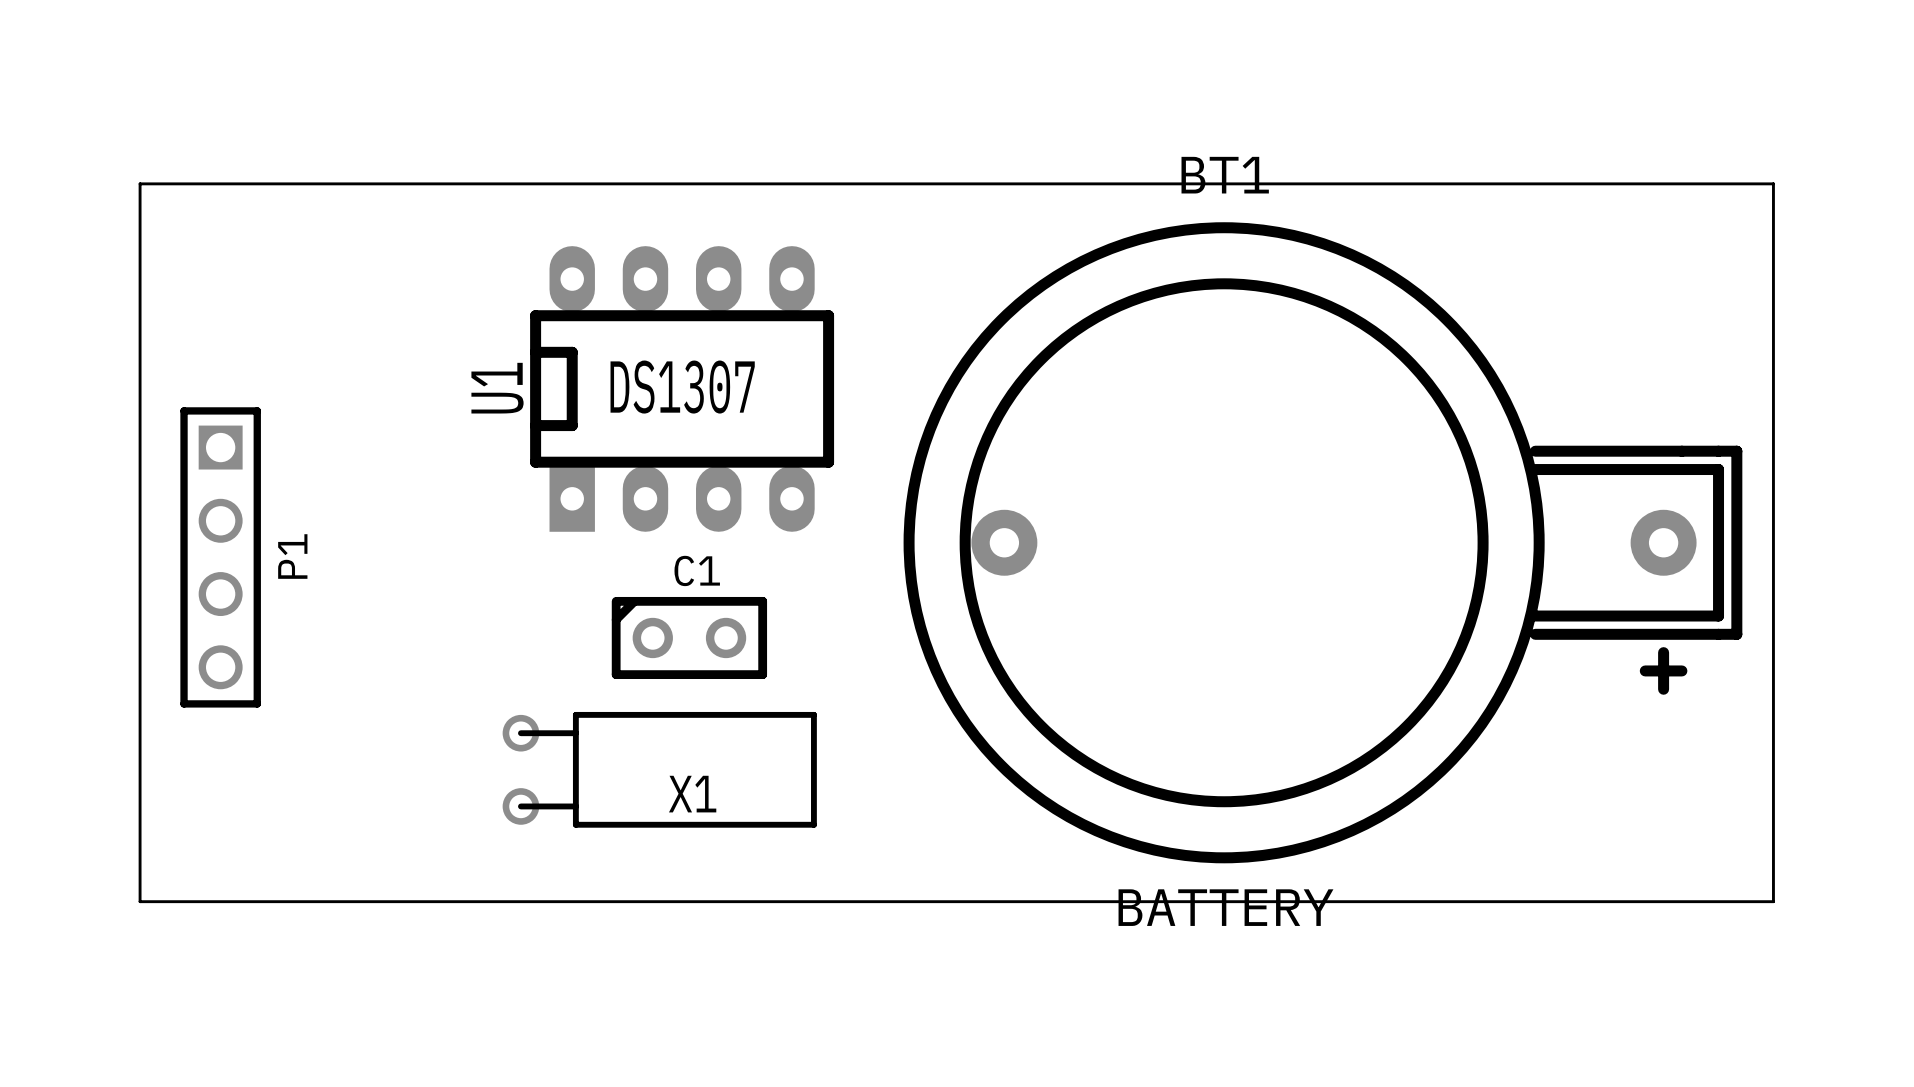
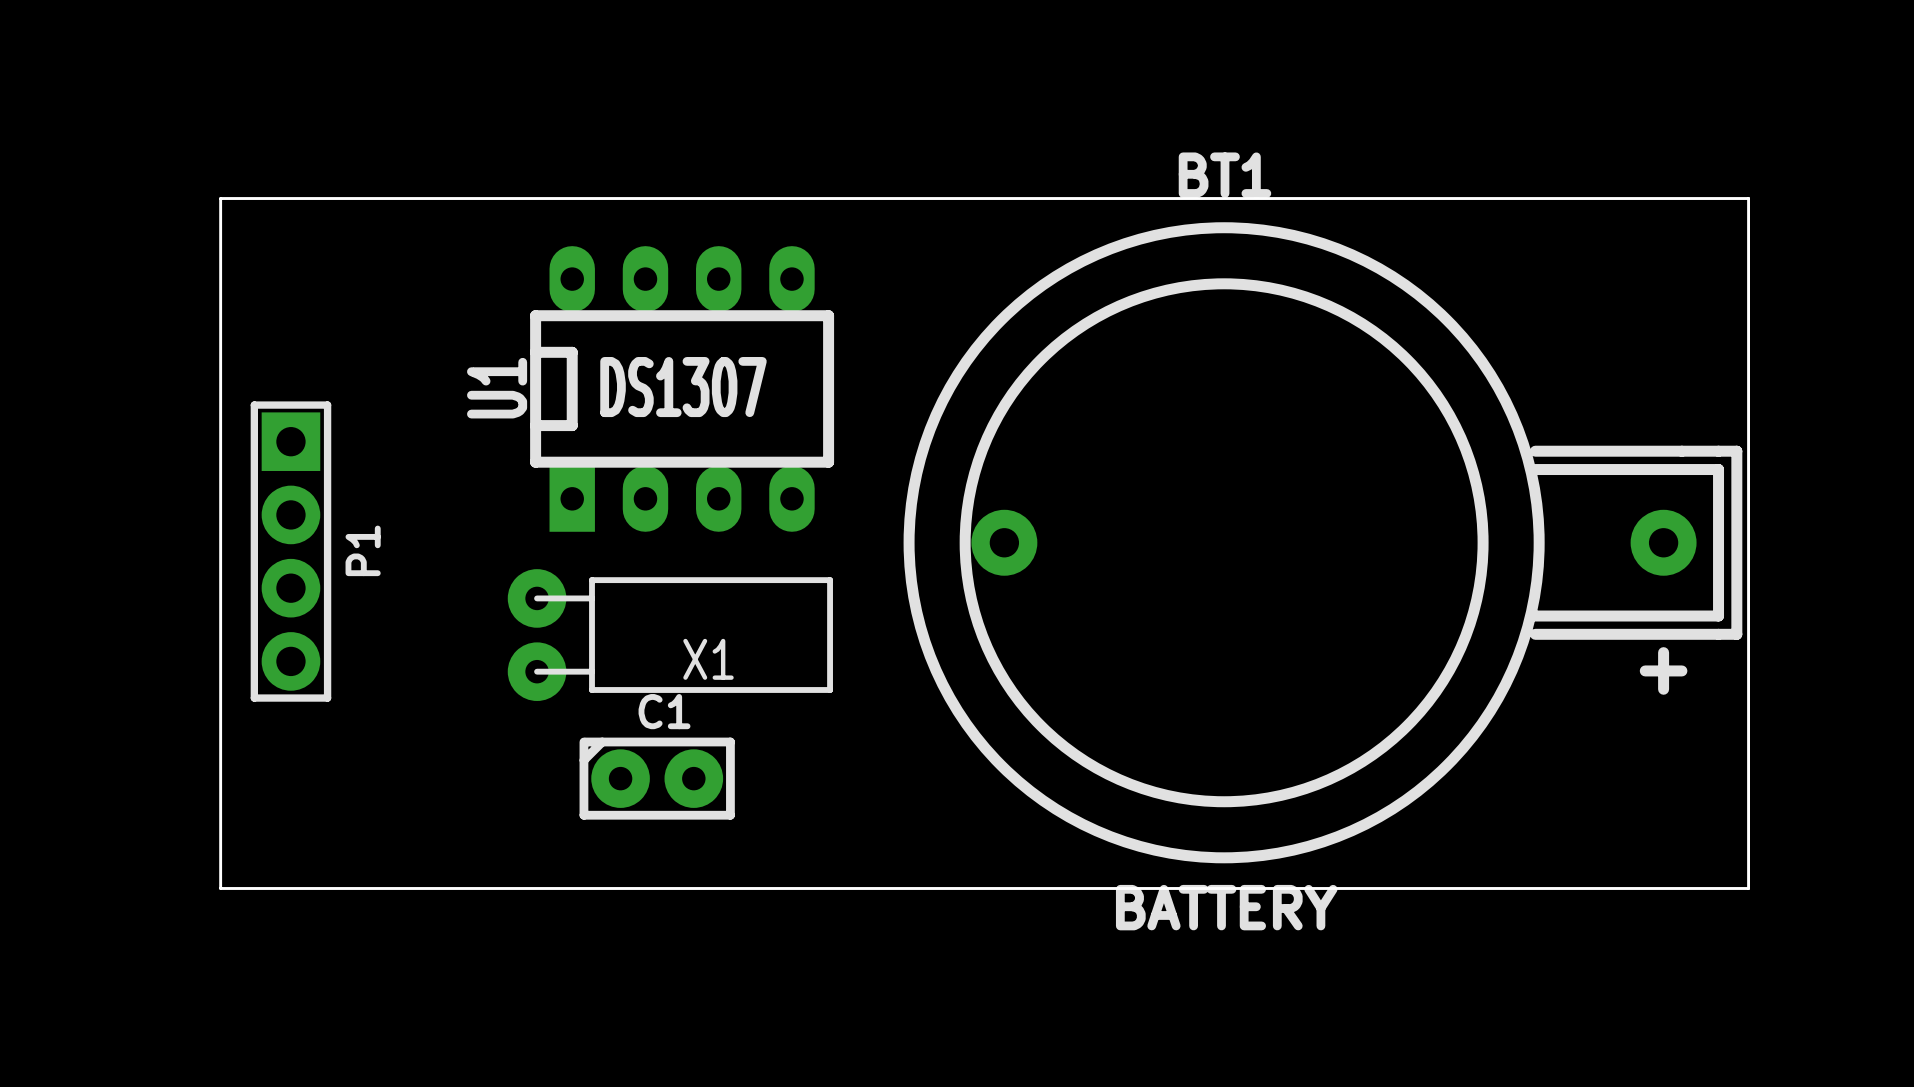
board edge: (140, 183) (1773, 183) (1773, 901) (140, 901) (140, 183) -> (220, 198) (220, 888) (1748, 888) (1748, 198) (220, 198)
P1 footprint: [180, 407, 261, 708] -> [250, 401, 332, 702]
C1 footprint: [611, 596, 768, 680] -> [579, 737, 735, 820]
X1 footprint: [502, 711, 817, 828] -> [507, 569, 833, 701]

